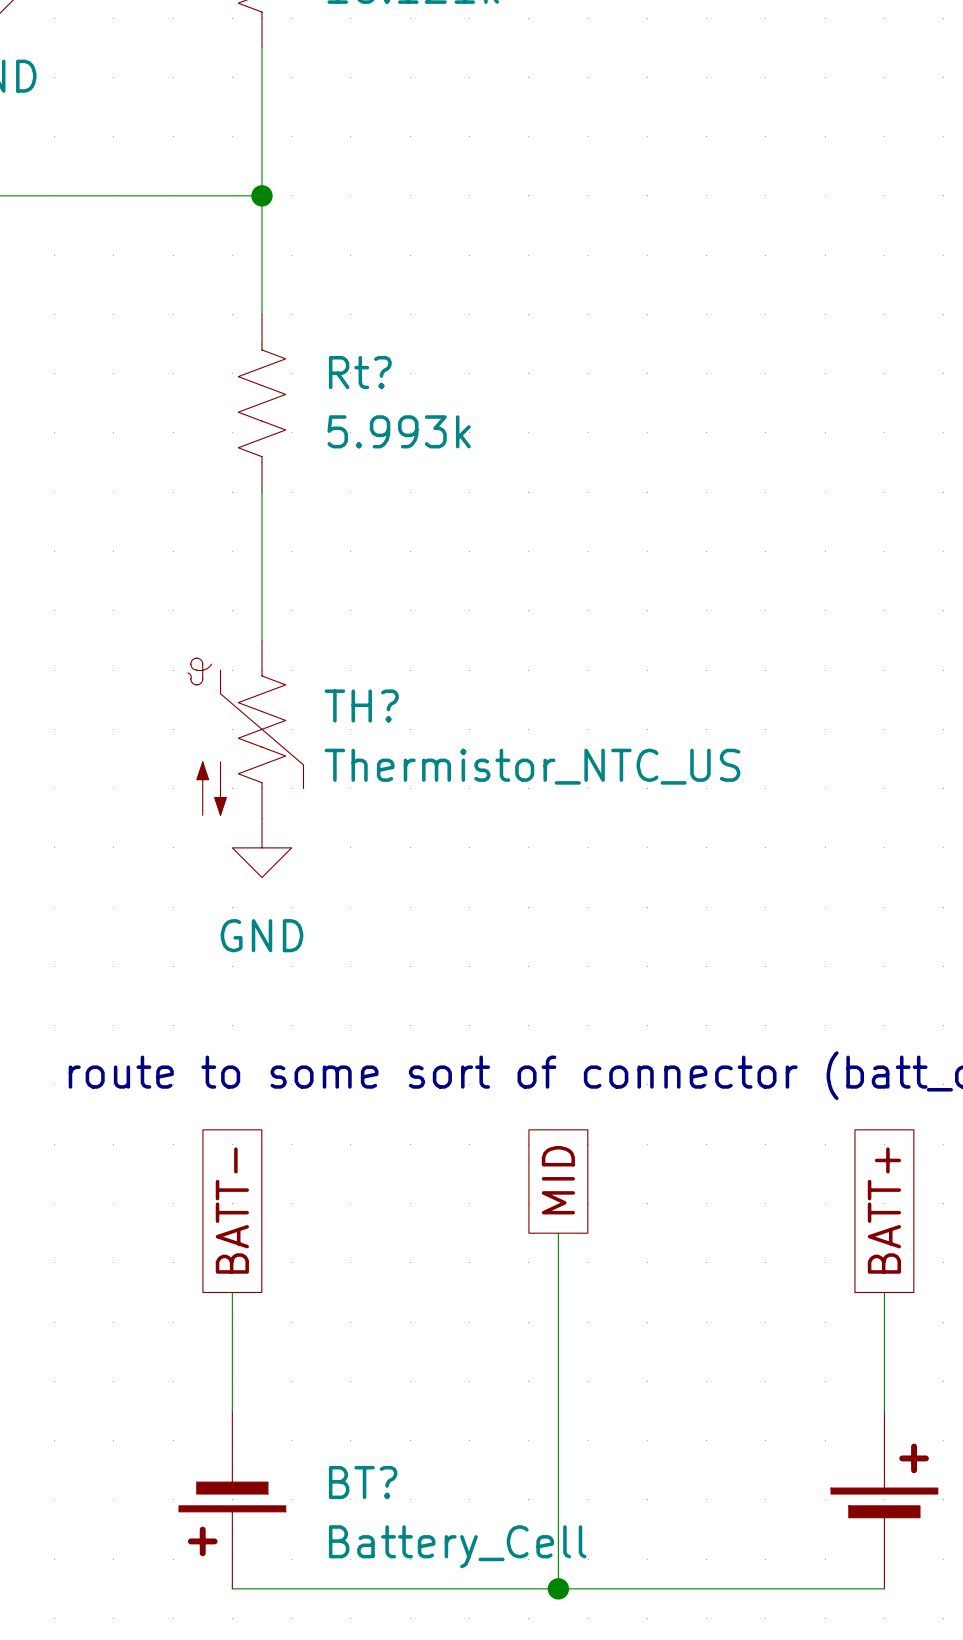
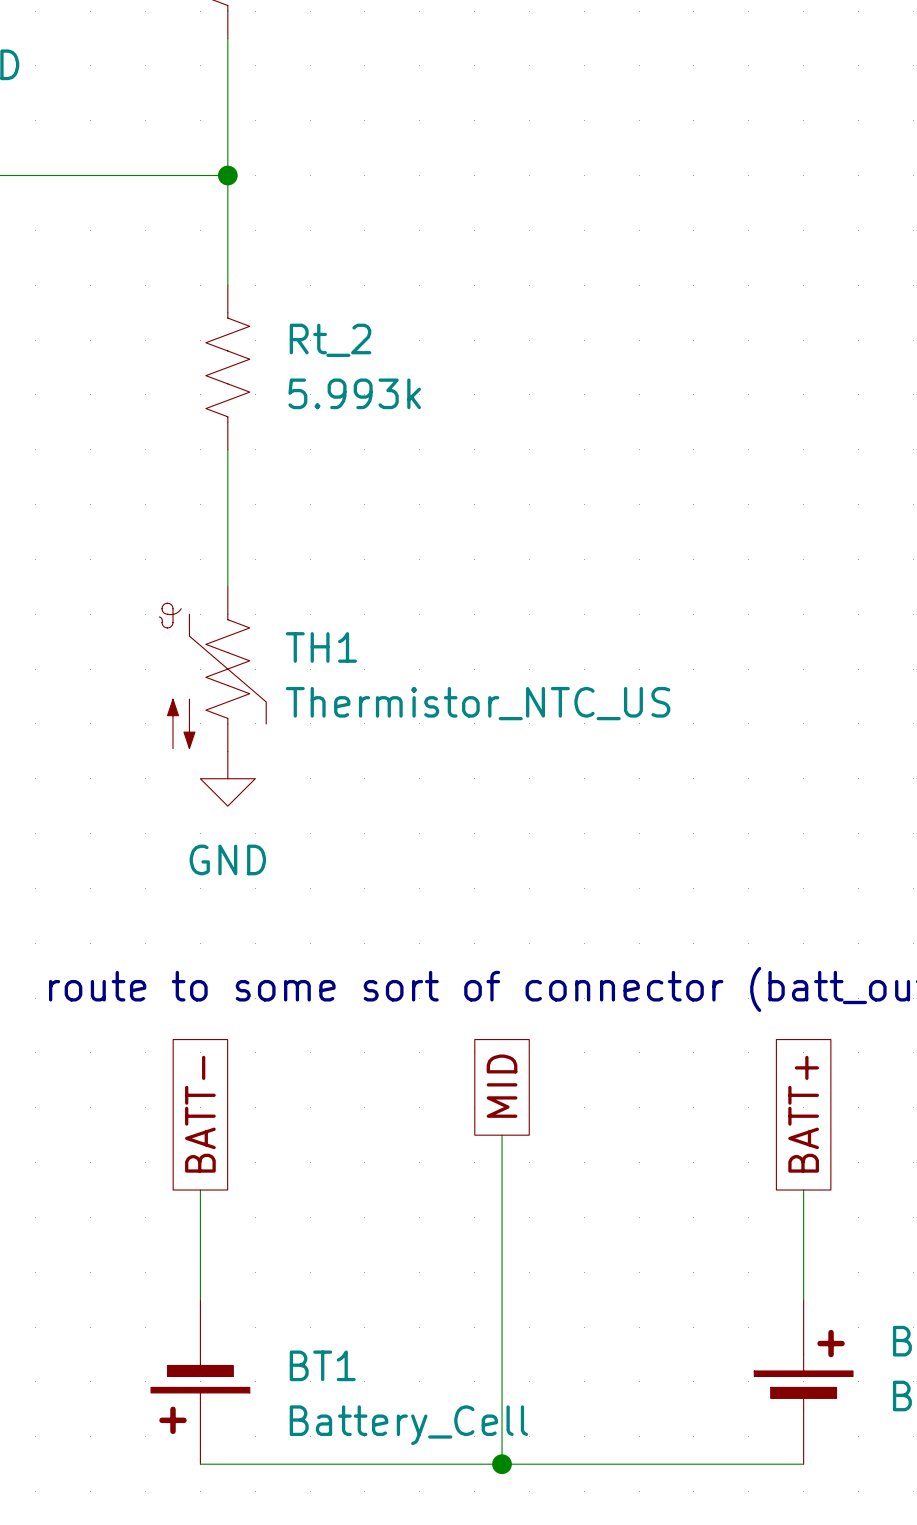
Rt? name: Rt? (360, 372) -> Rt_2 (330, 340)
TH? name: TH? (361, 705) -> TH1 (321, 647)
BT? name: BT? (363, 1482) -> BT1 (322, 1365)

